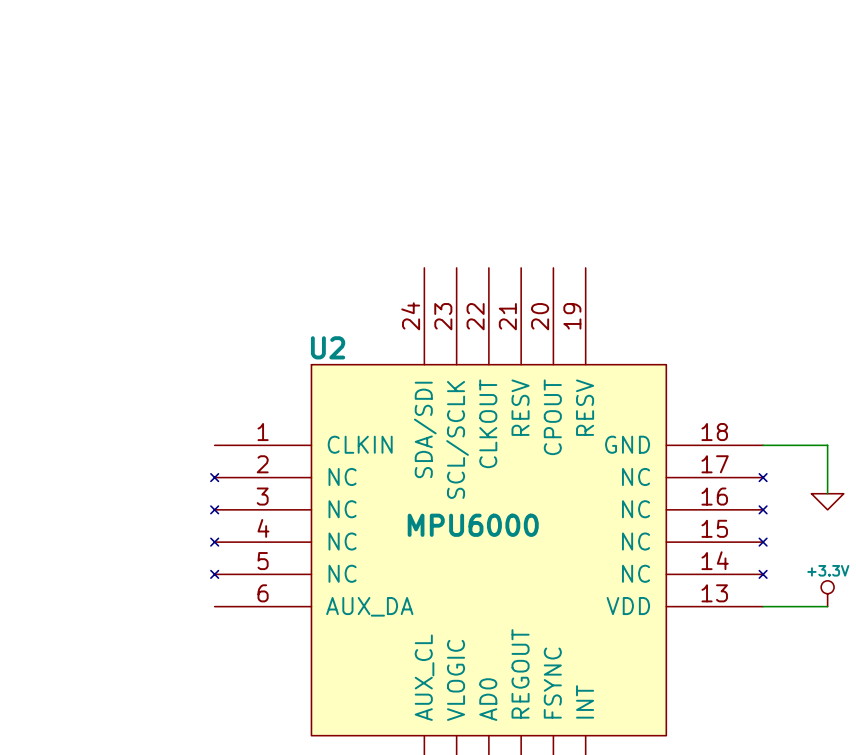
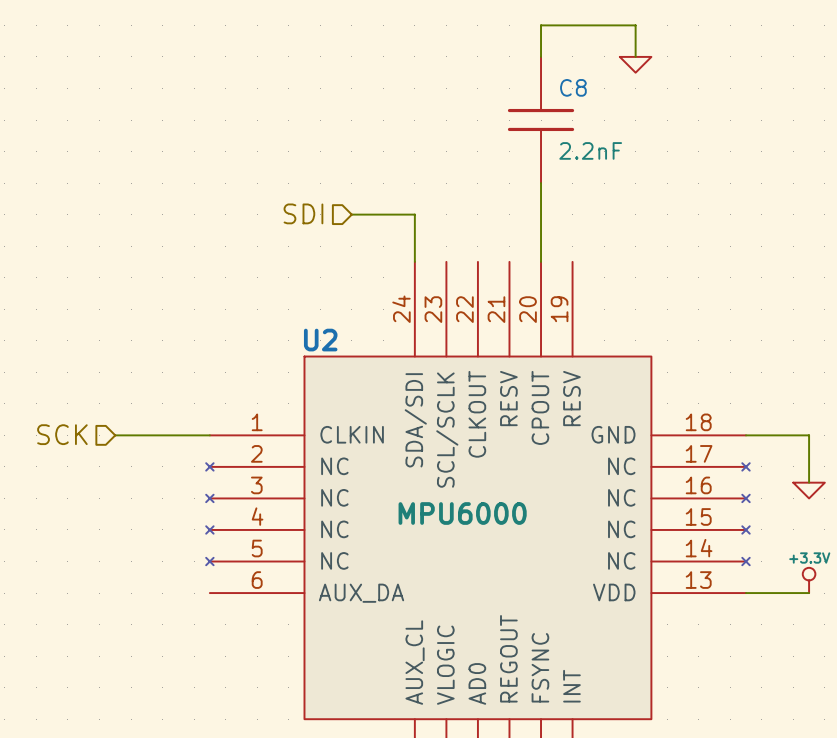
wire: none -> (541, 56) (541, 25) (635, 25) (635, 56)
power symbol: none -> (635, 64)
C8: none -> 2.2nF (541, 120)
wire: none -> (541, 183) (541, 261)
hierarchical label: none -> SDI (303, 213)
wire: none -> (351, 214) (414, 214) (414, 261)
hierarchical label: none -> SCK (62, 434)
wire: none -> (115, 435) (209, 435)

